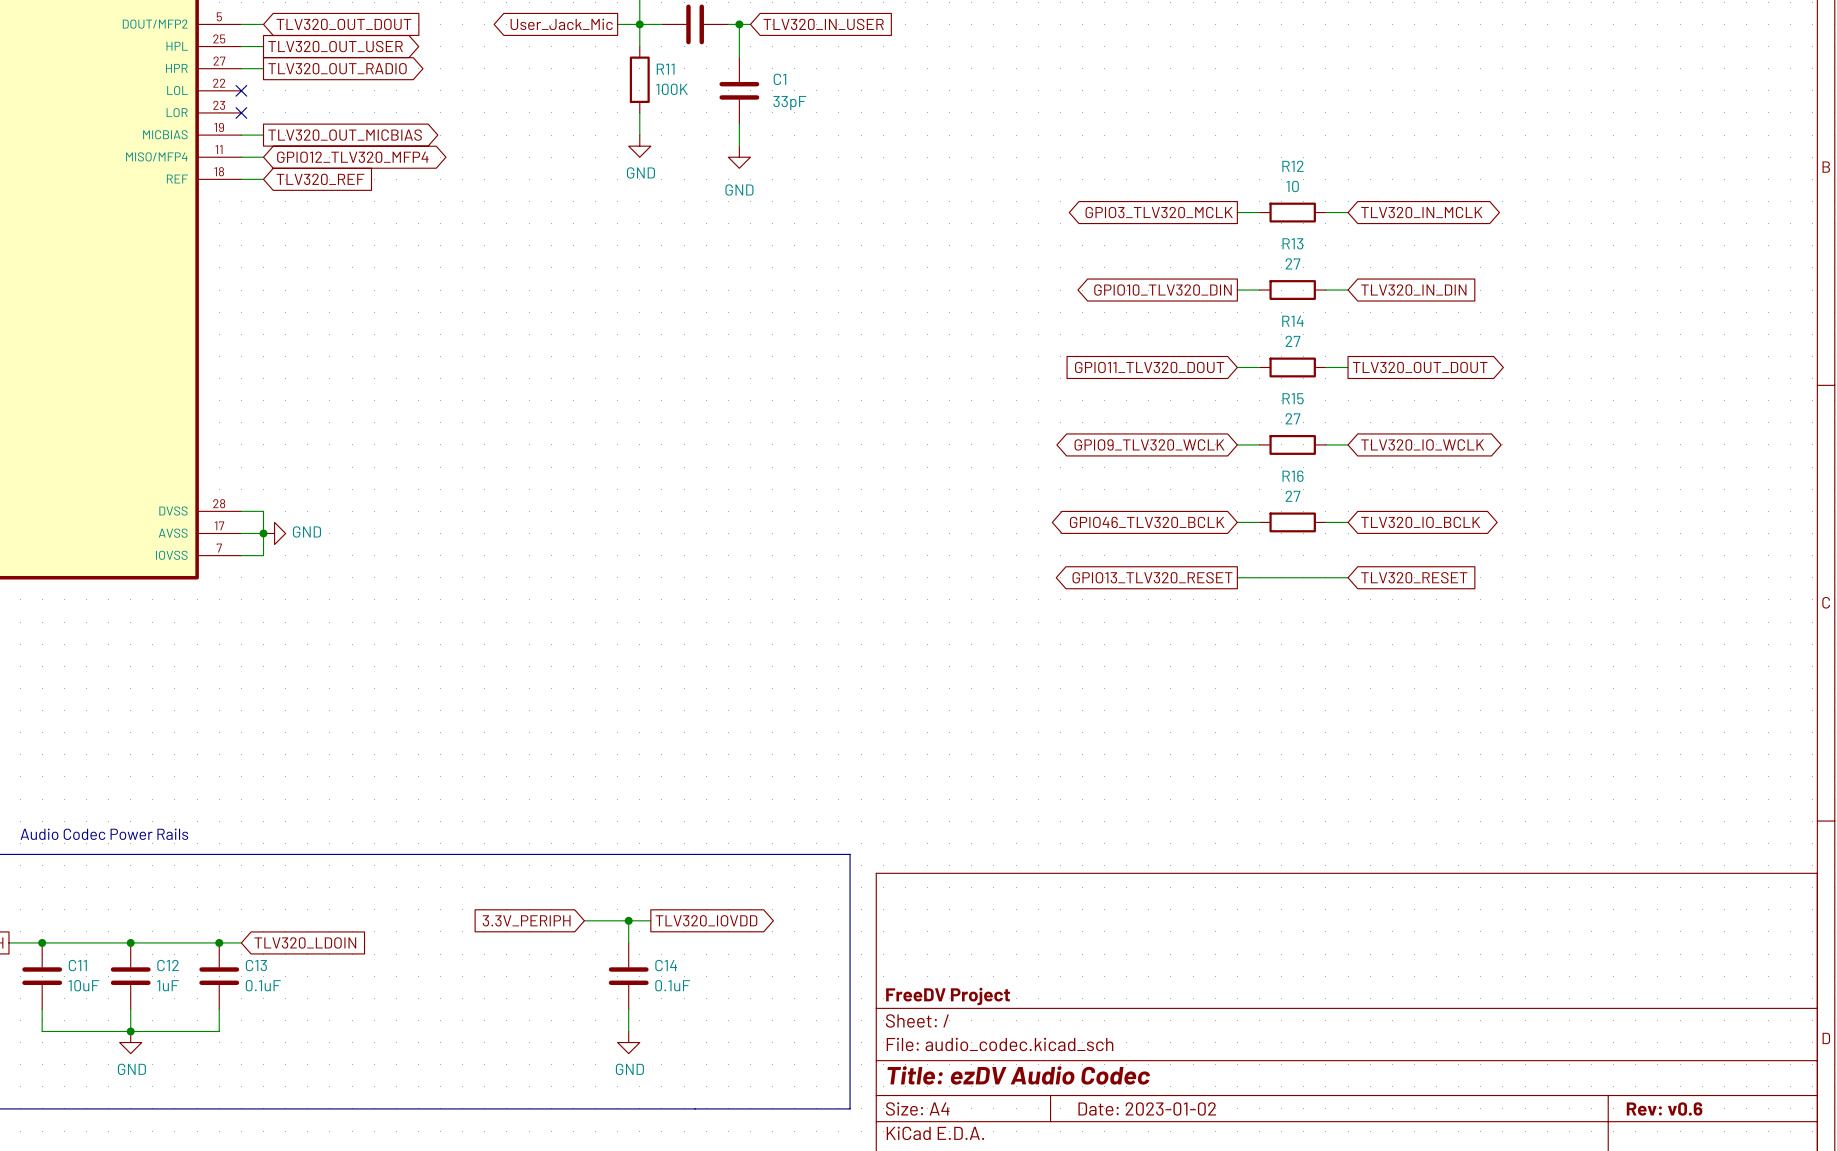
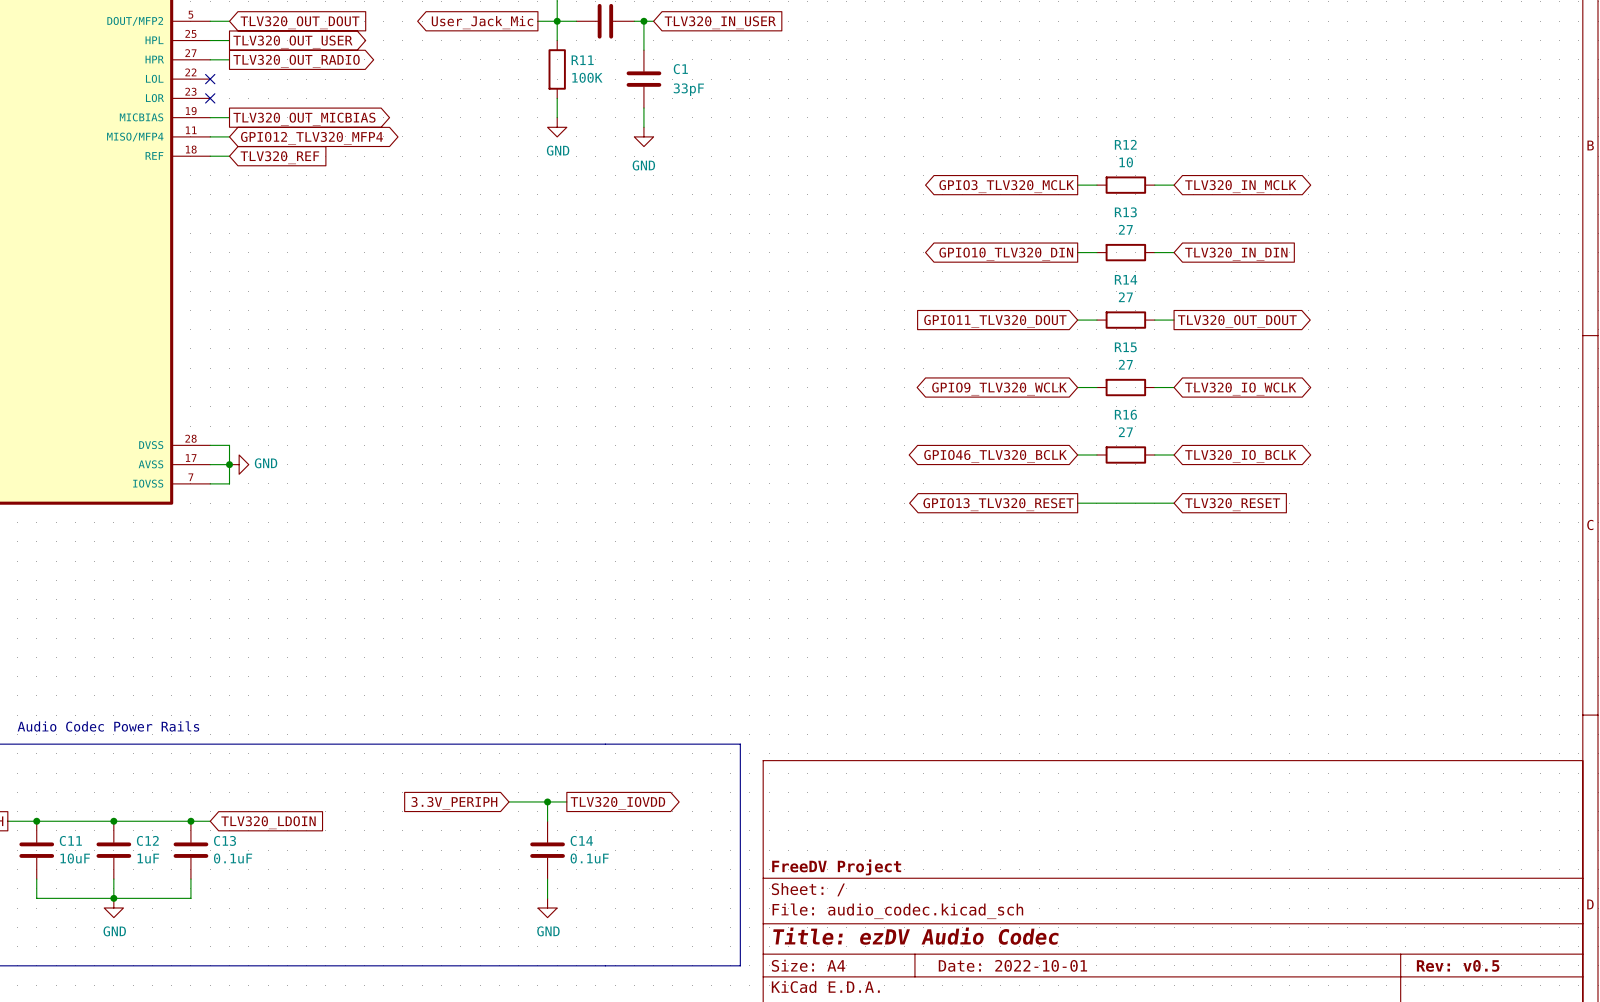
title block: Date: 2023-01-02 (1147, 1108) -> Date: 2022-10-01 (1012, 965)
title block: Rev: v0.6 (1664, 1109) -> Rev: v0.5 (1458, 965)

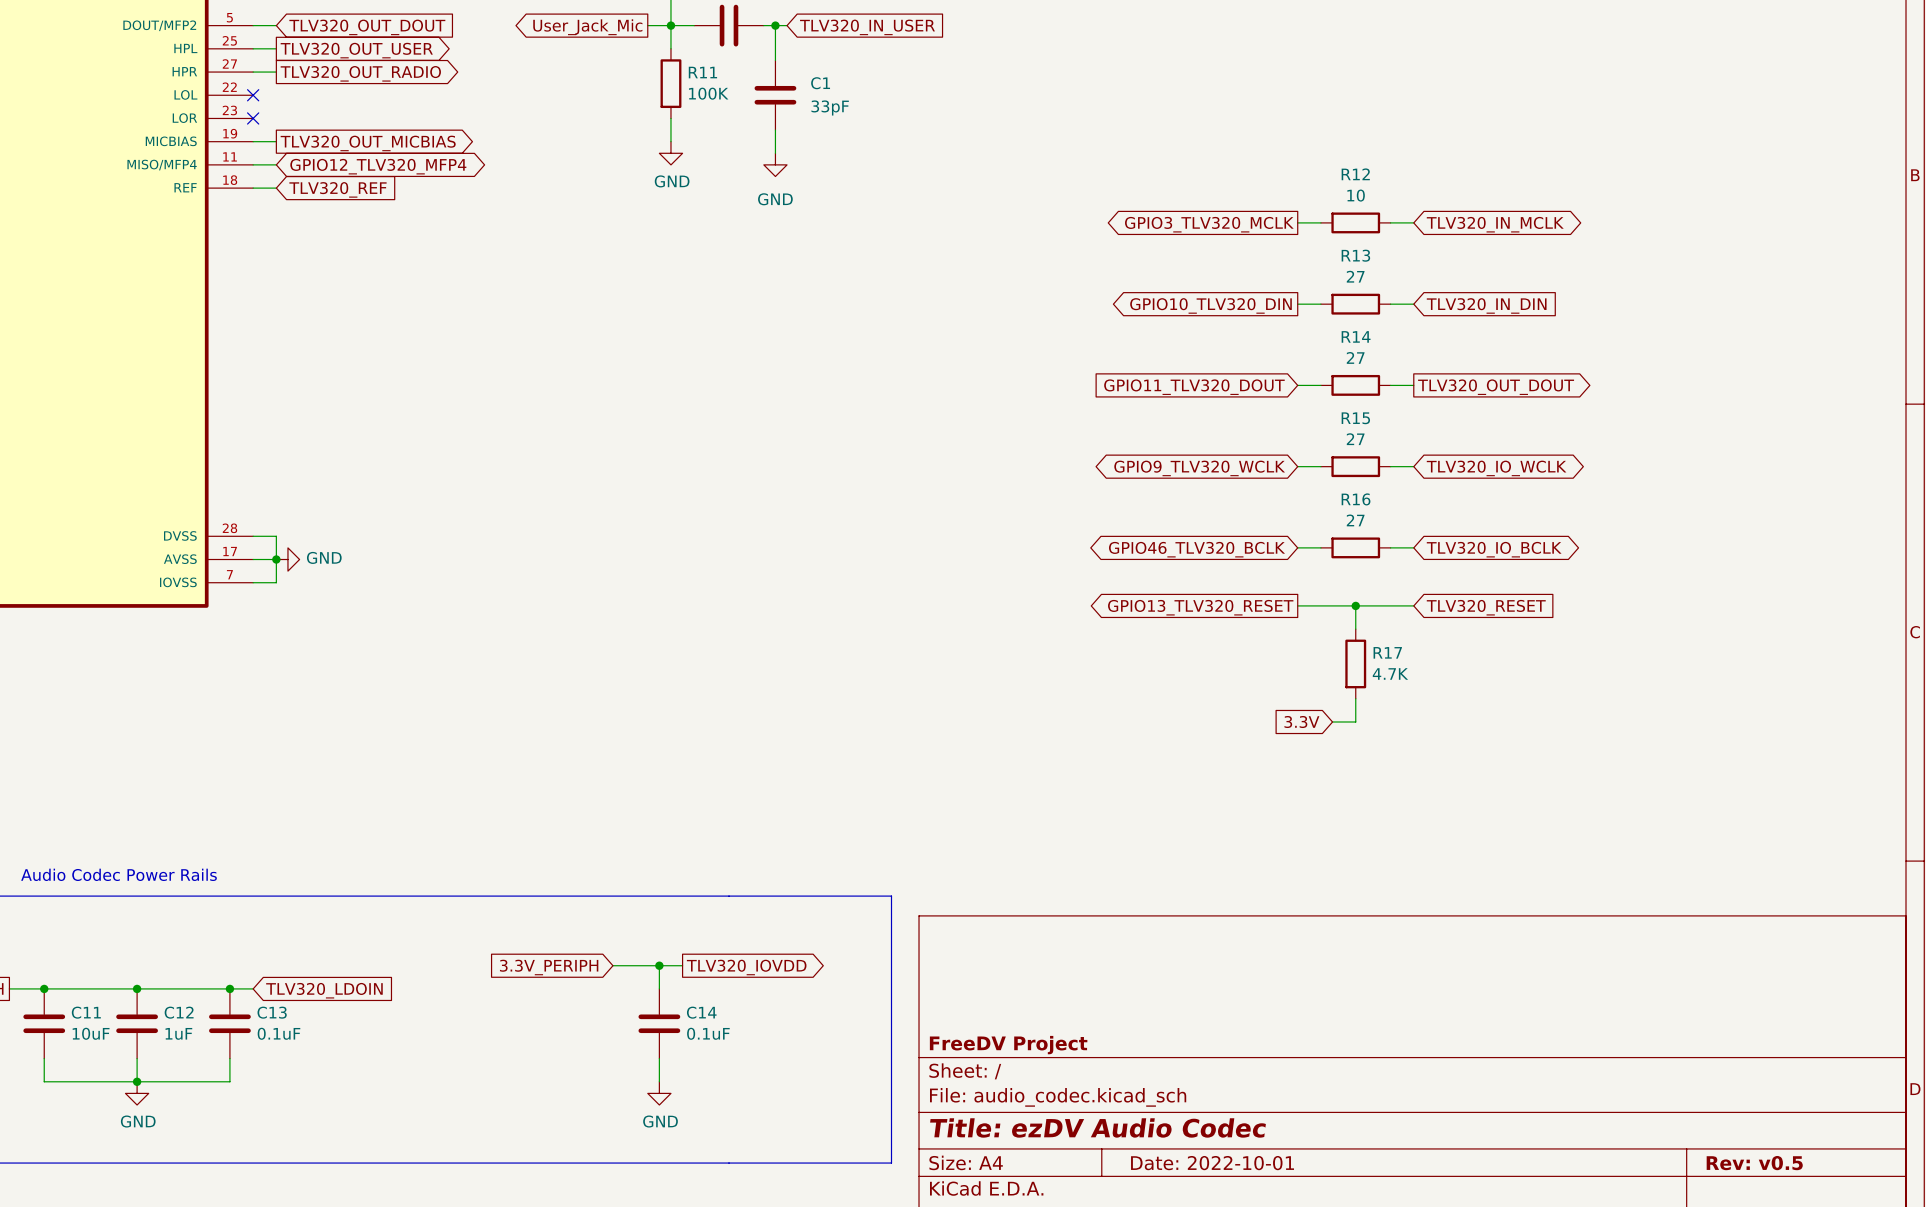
wire: none -> (1355, 605) (1355, 629)
junction: none -> (1355, 605)
R17: none -> 4.7K (1355, 663)
wire: none -> (1355, 698) (1355, 721) (1332, 721)
global label: none -> 3.3V (1301, 722)

